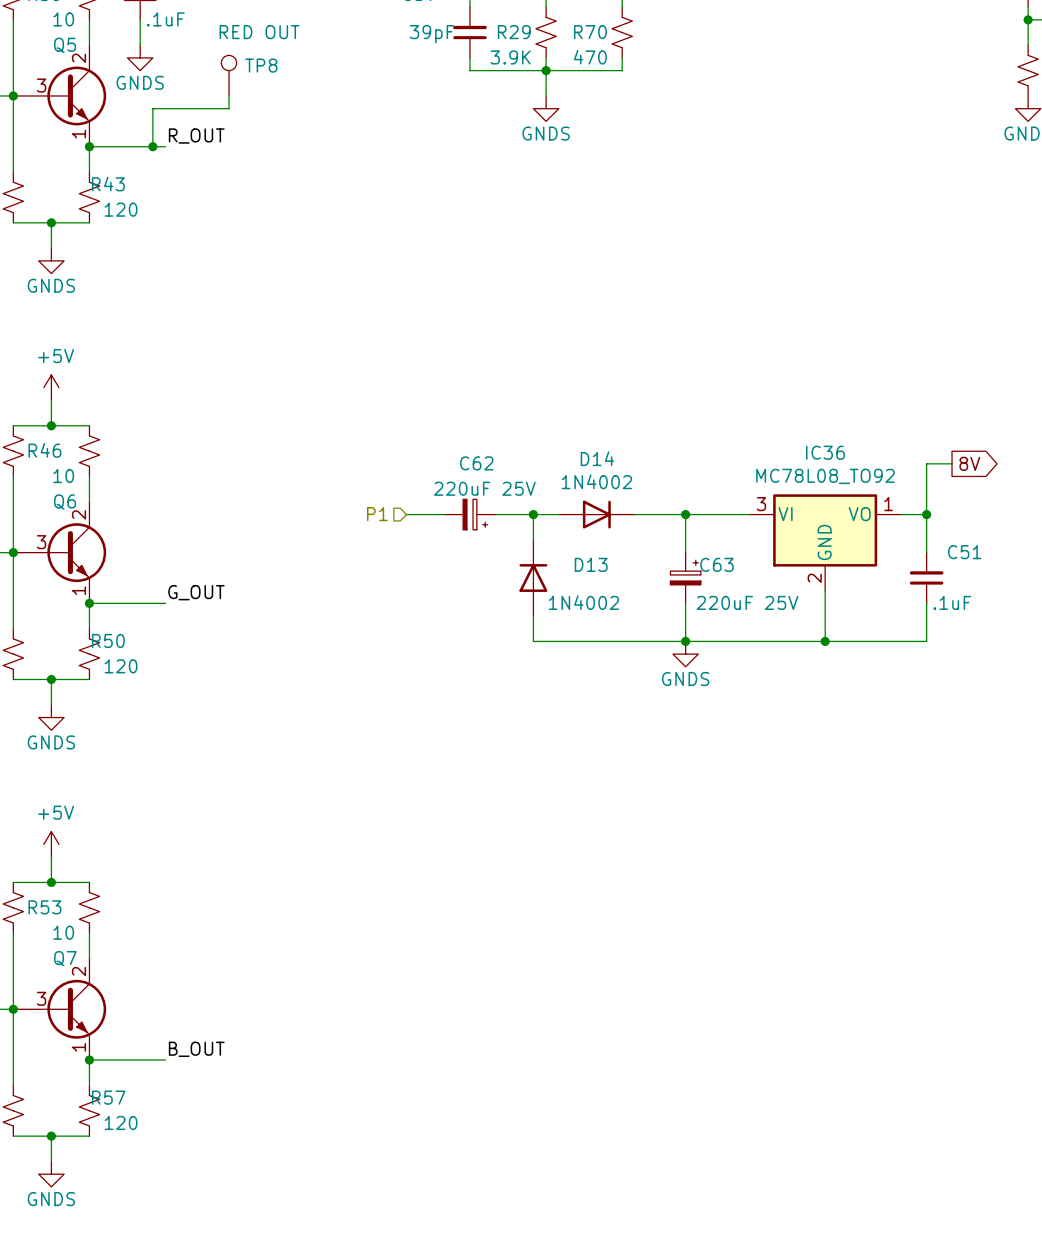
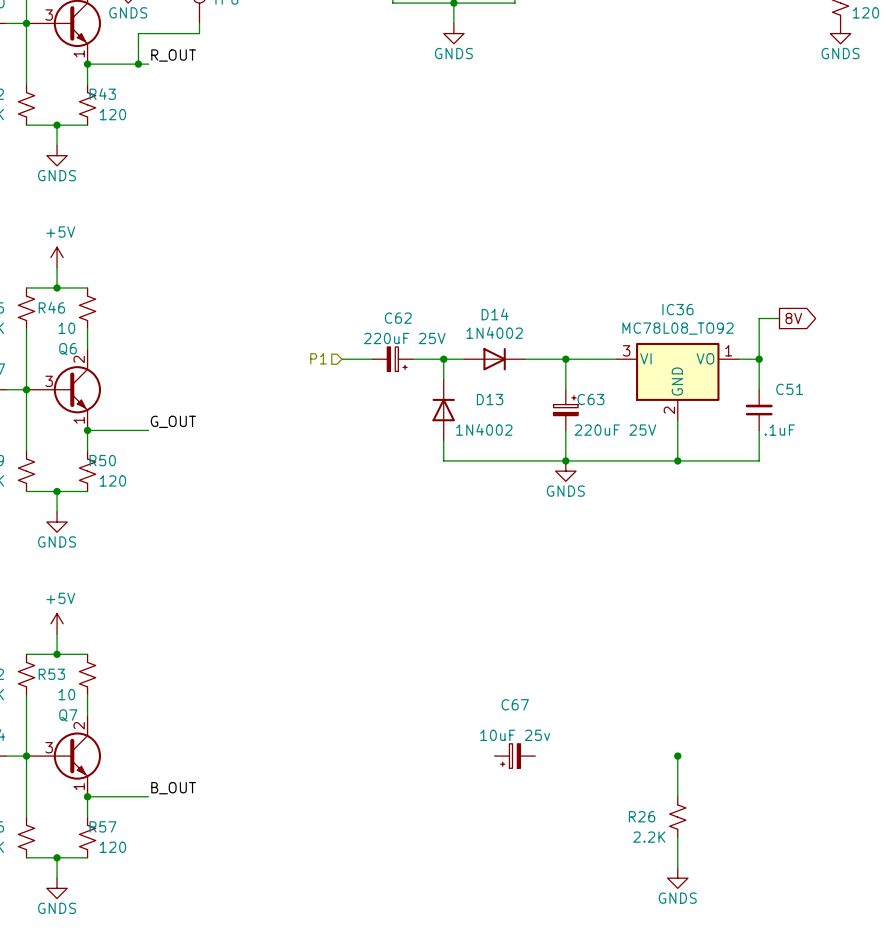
C67: none -> 10uF 25v (514, 756)
wire: none -> (677, 756) (677, 796)
junction: none -> (677, 756)
R26: none -> 2.2K (677, 817)
wire: none -> (677, 837) (677, 868)
power symbol: none -> GNDS (677, 878)

